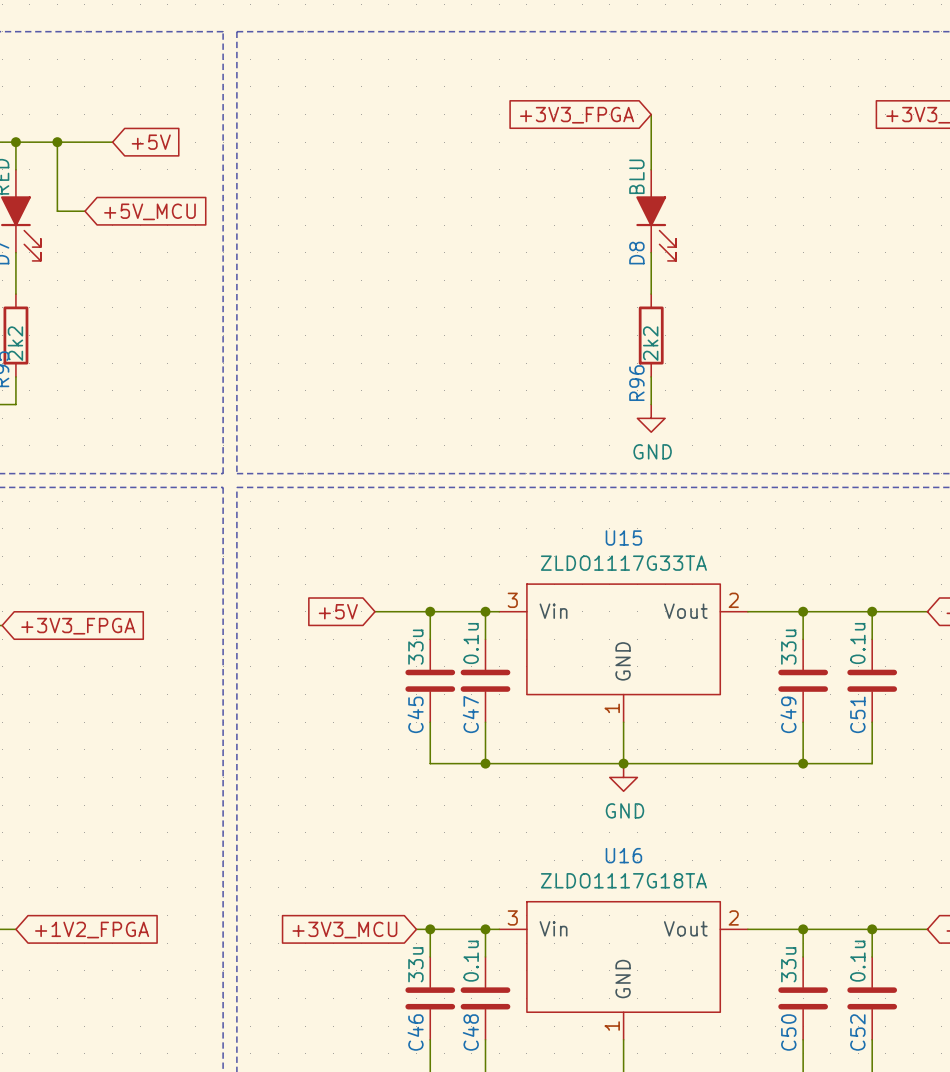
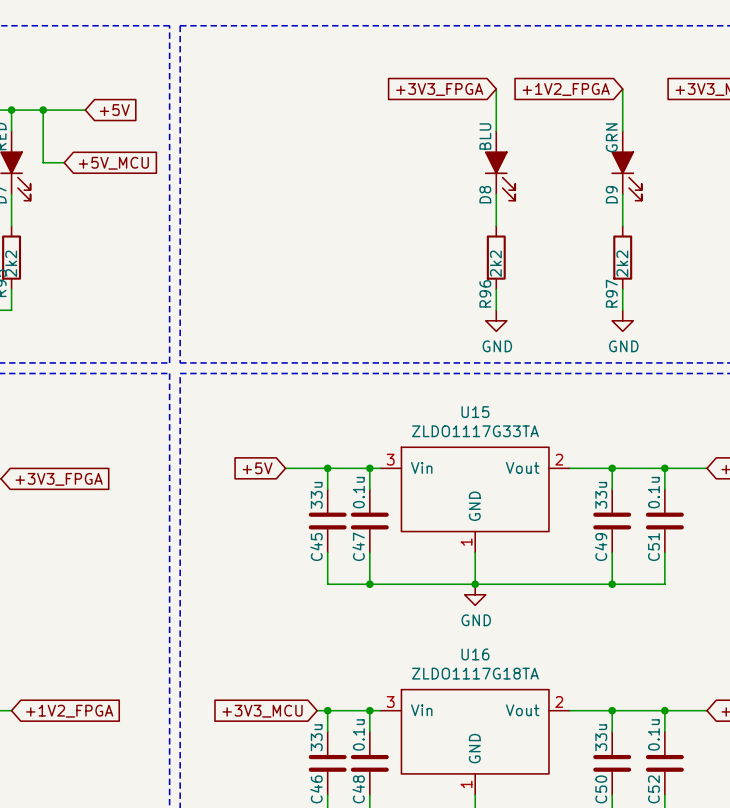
wire: none -> (622, 88) (622, 131)
global label: none -> +1V2_FPGA (566, 89)
D9: none -> GRN (626, 165)
wire: none -> (622, 194) (622, 225)
R97: none -> 2k2 (622, 257)
wire: none -> (622, 289) (622, 310)
power symbol: none -> GND (622, 320)

